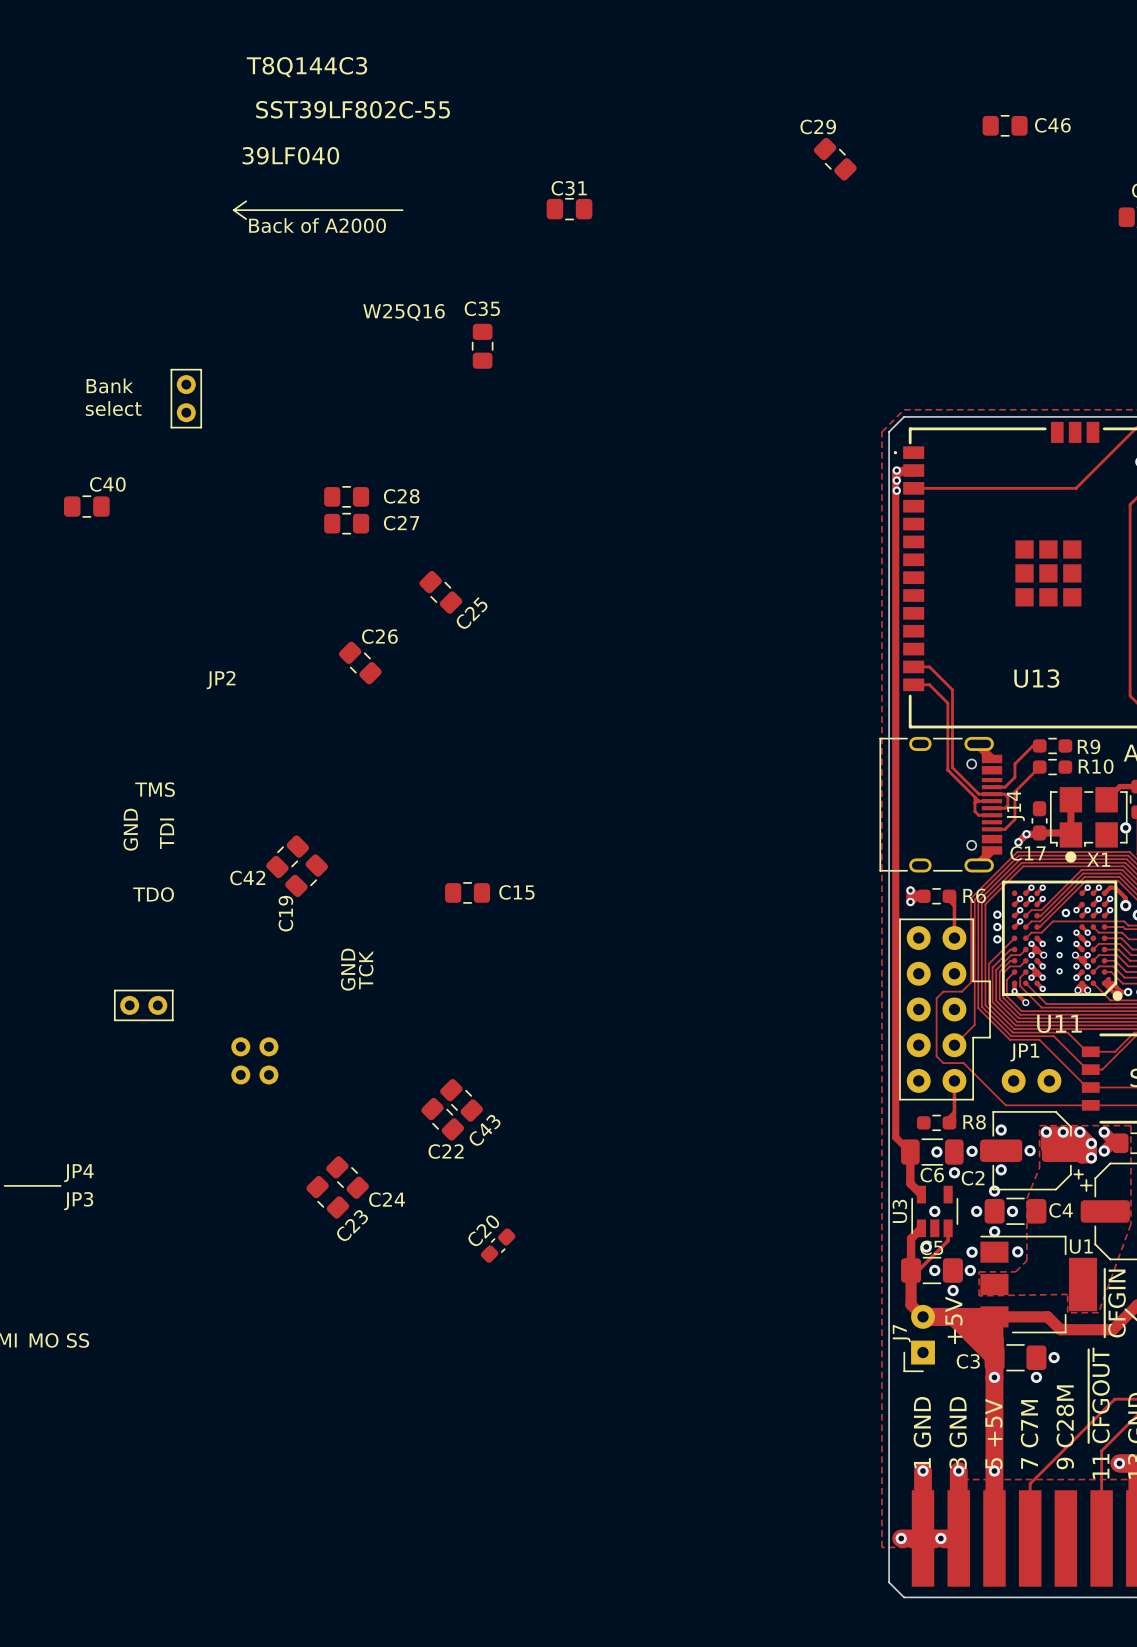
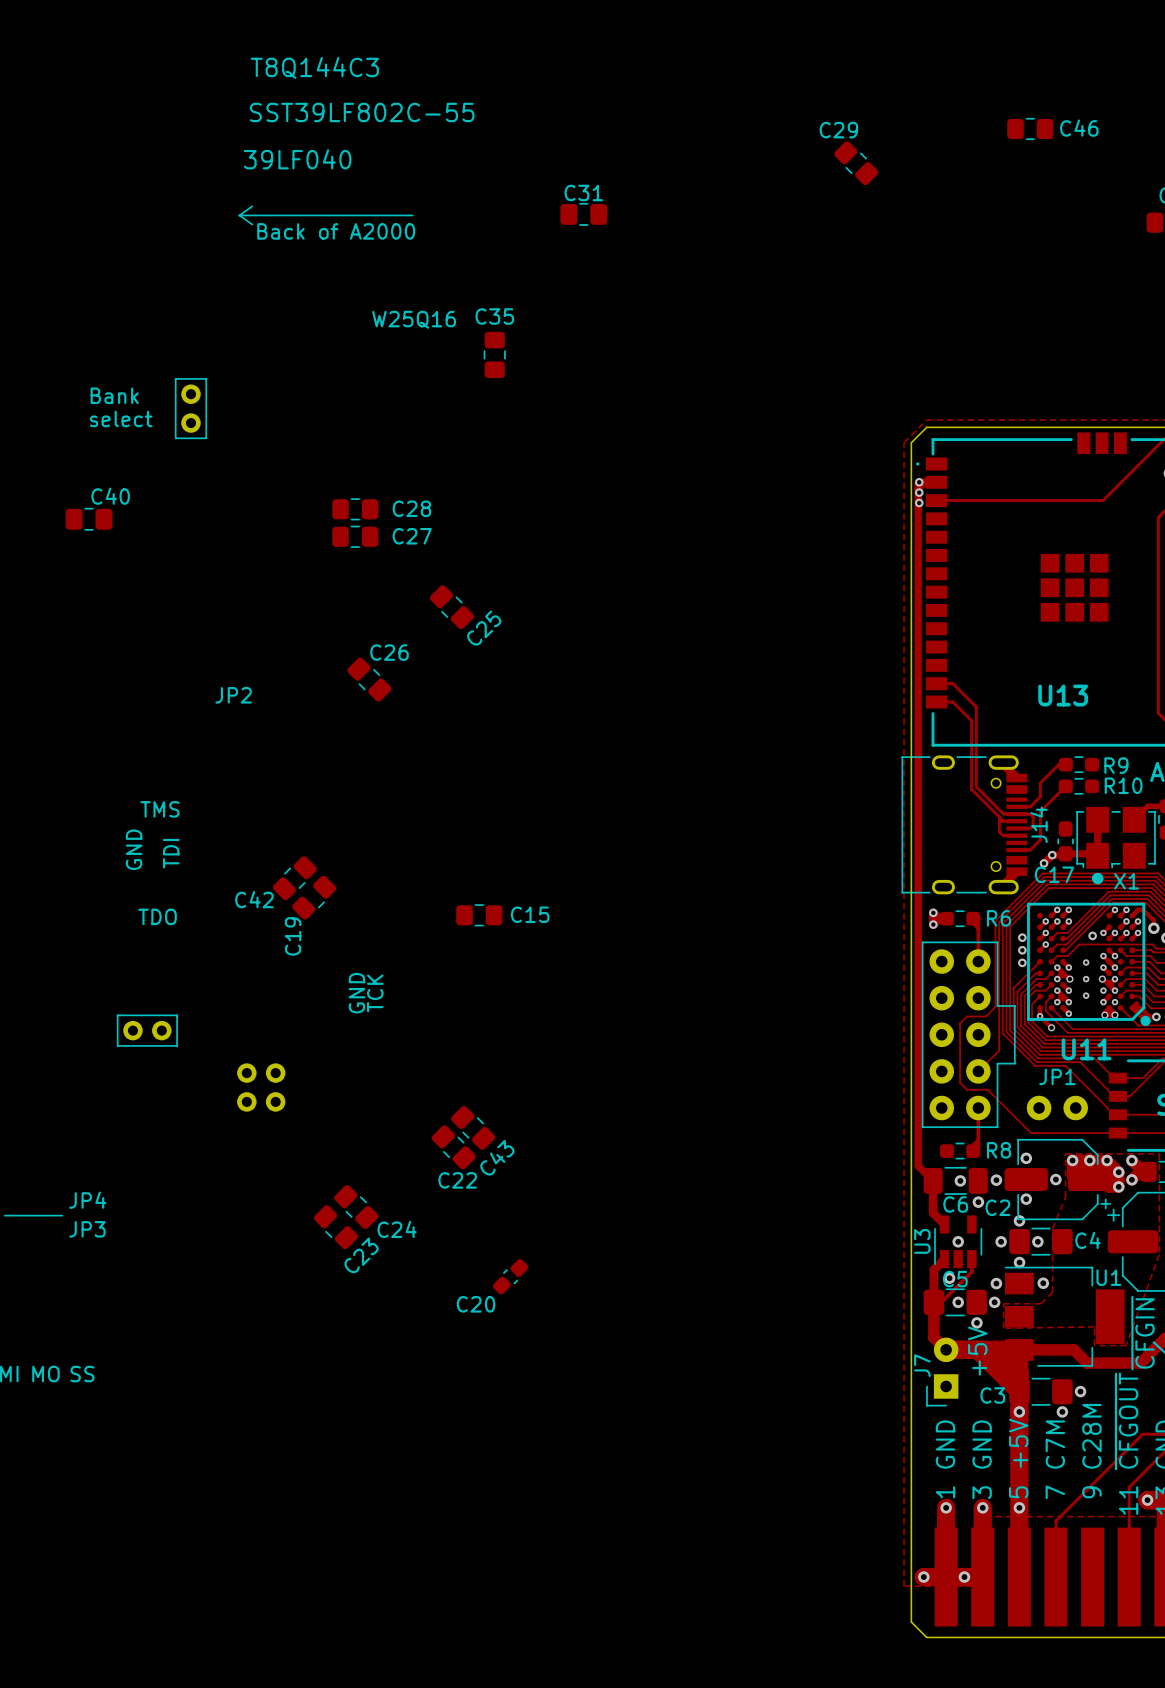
X1 footprint: [1049, 787, 1128, 863] -> [1076, 806, 1156, 885]
via: (1125, 827) -> none
C20 name rotation: 0° (483, 1230) -> 45° clockwise (476, 1304)

